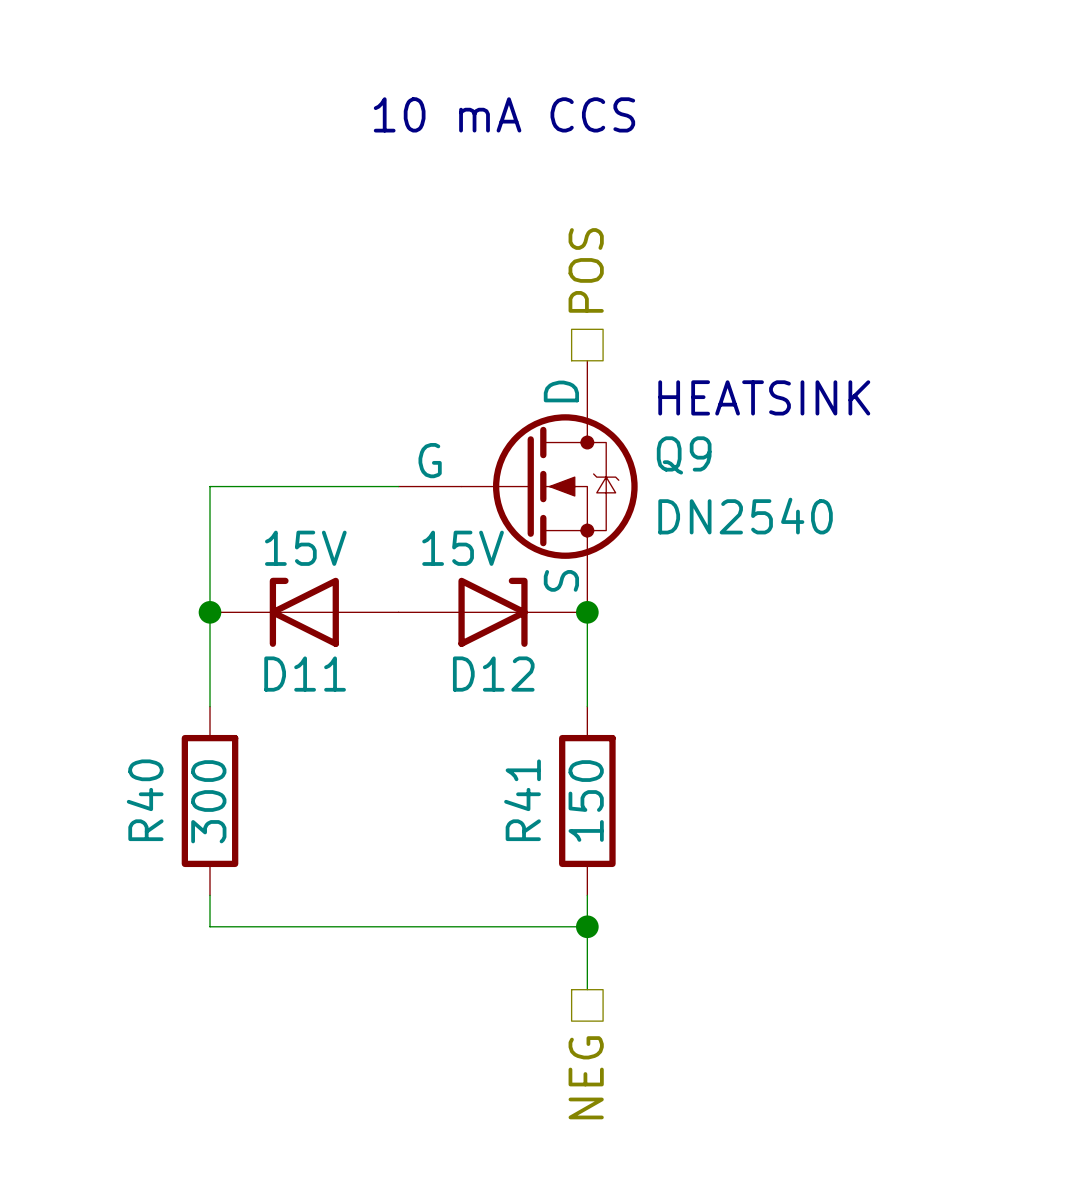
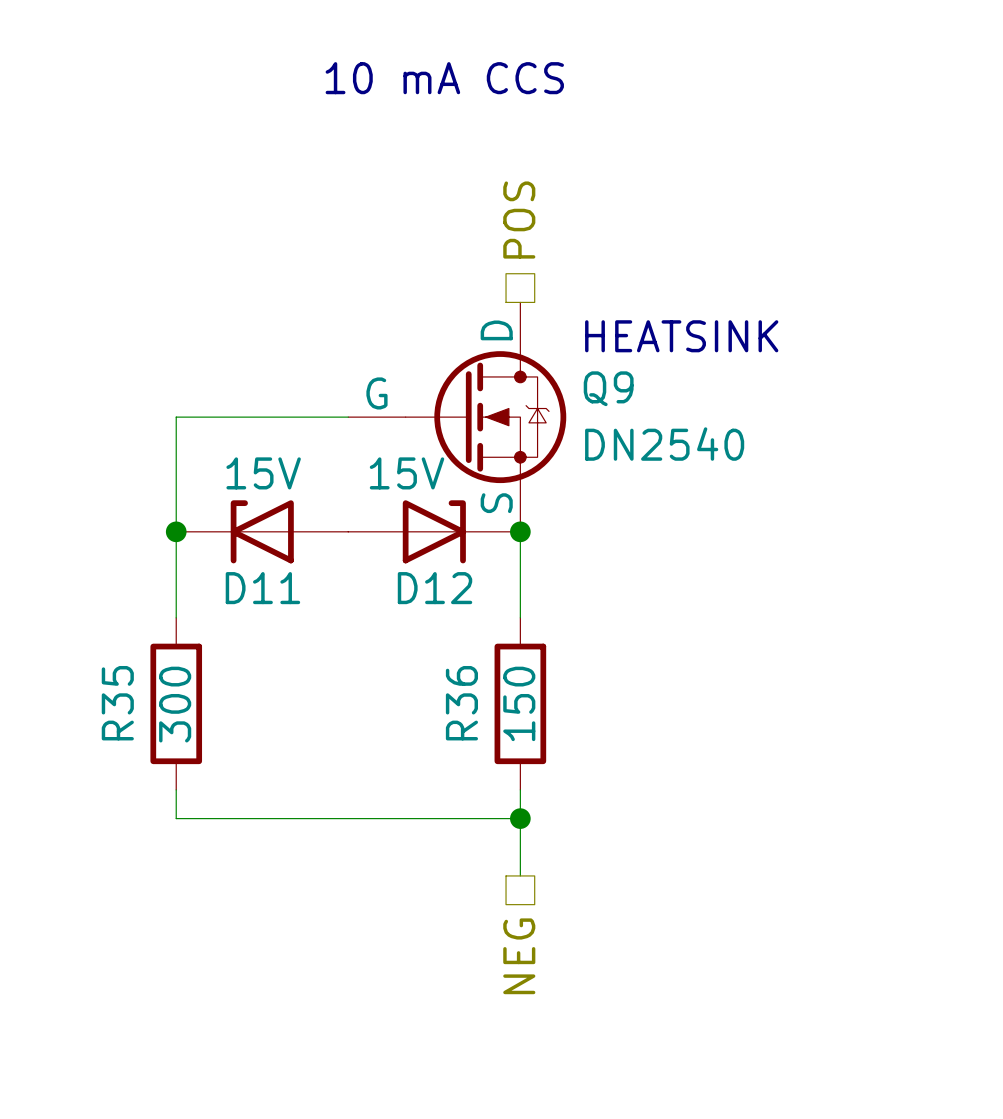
R40 name: R40 (145, 800) -> R35 (117, 703)
R41 name: R41 (522, 800) -> R36 (461, 703)

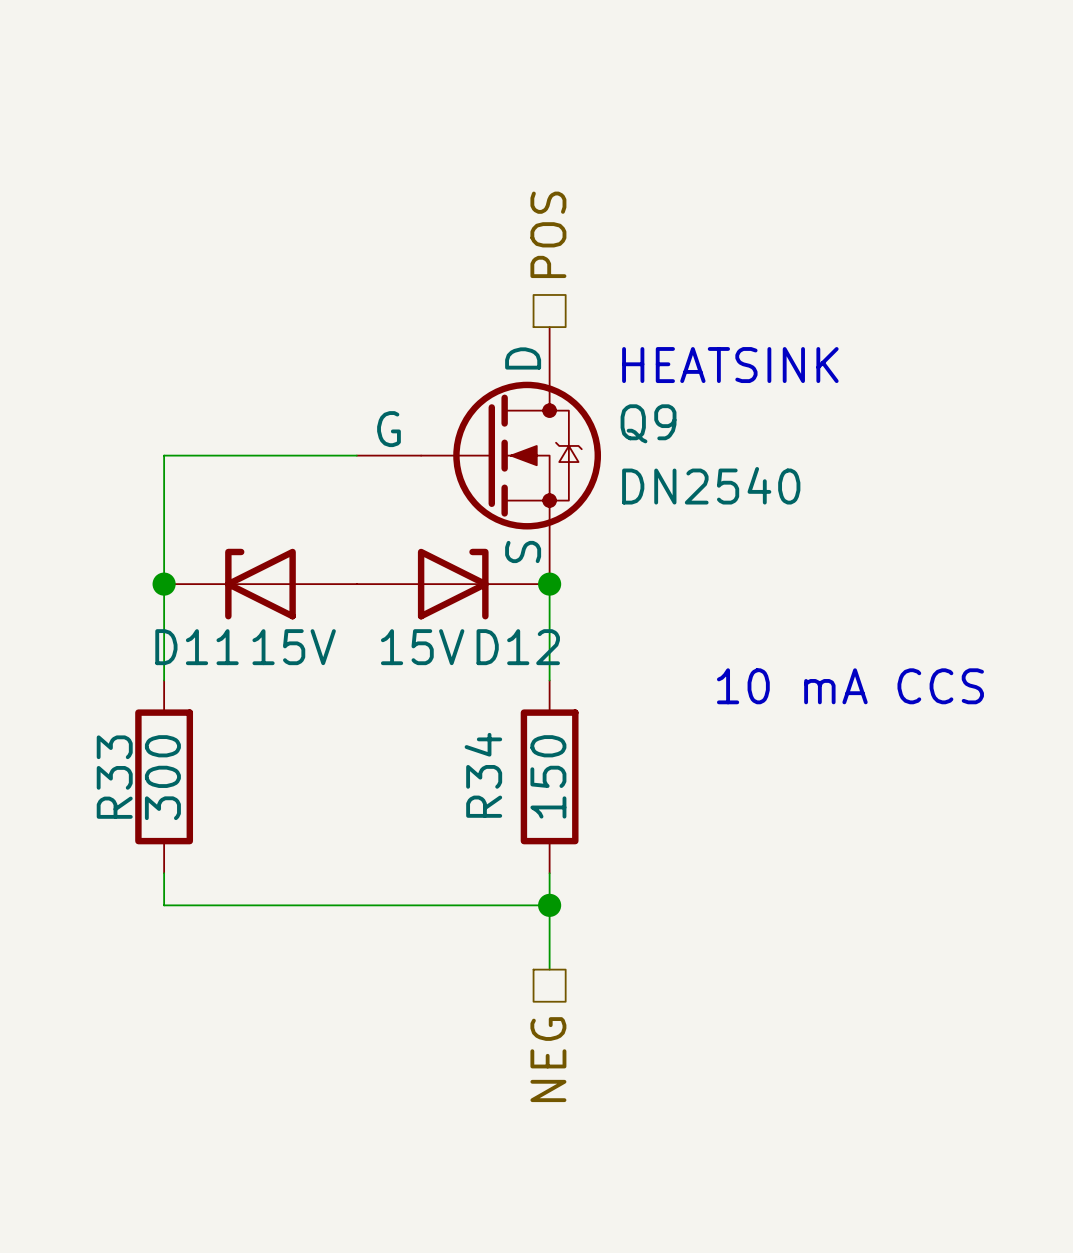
text: 10 mA CCS (444, 78) -> none
D11 value position: 15V (263, 473) -> 15V (294, 647)
D12 value position: 15V (407, 473) -> 15V (422, 647)
D11 name position: D11 (262, 588) -> D11 (197, 647)
D12 name position: D12 (435, 588) -> D12 (518, 647)
text: none -> 10 mA CCS (850, 686)
R35 name: R35 (117, 703) -> R33 (114, 777)
R36 name: R36 (461, 703) -> R34 (483, 775)

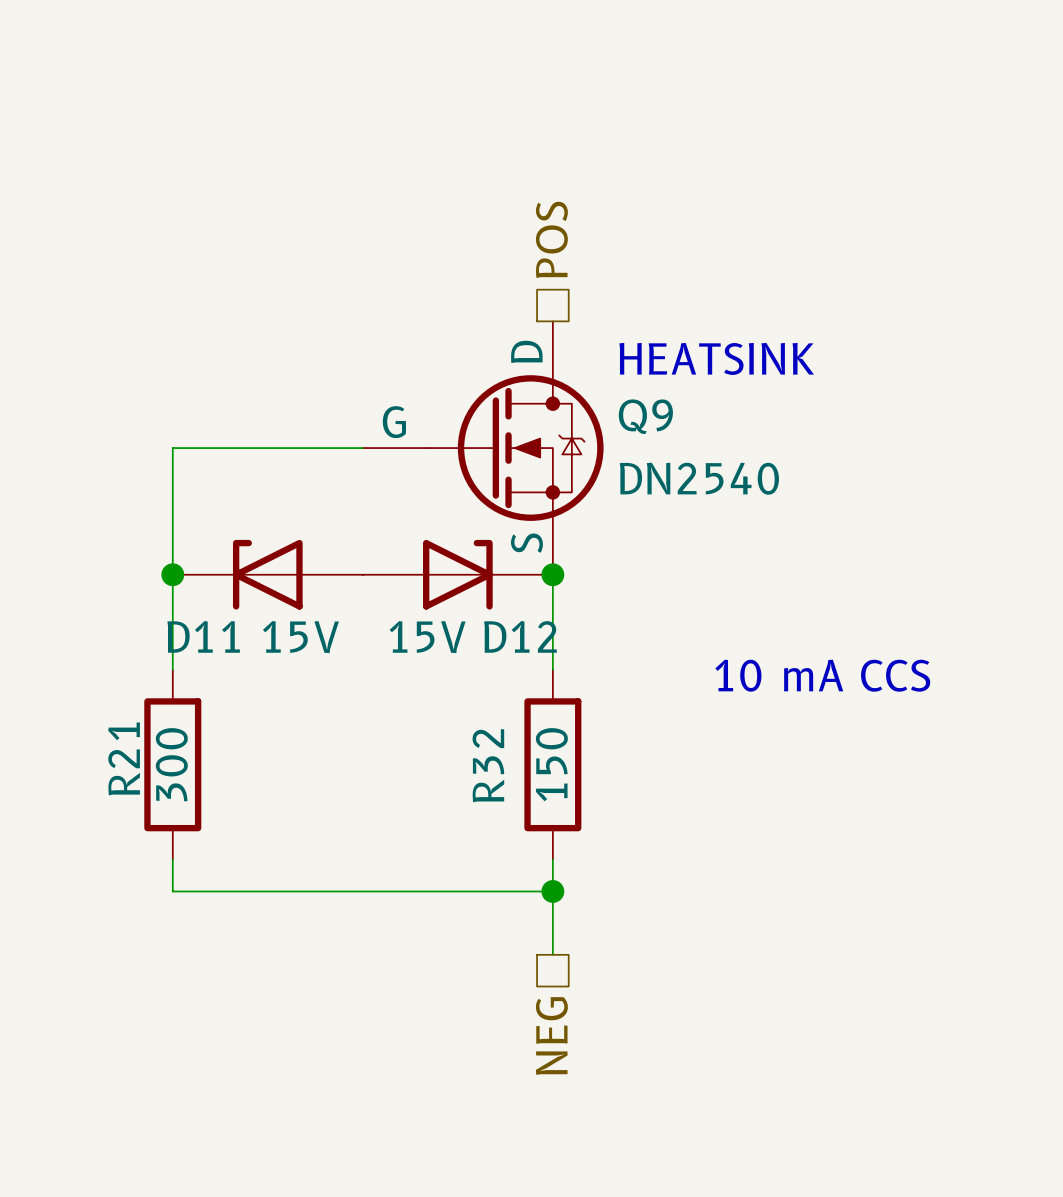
R34 name: R34 (483, 775) -> R32 (488, 765)
R33 name: R33 (114, 777) -> R21 (124, 758)

